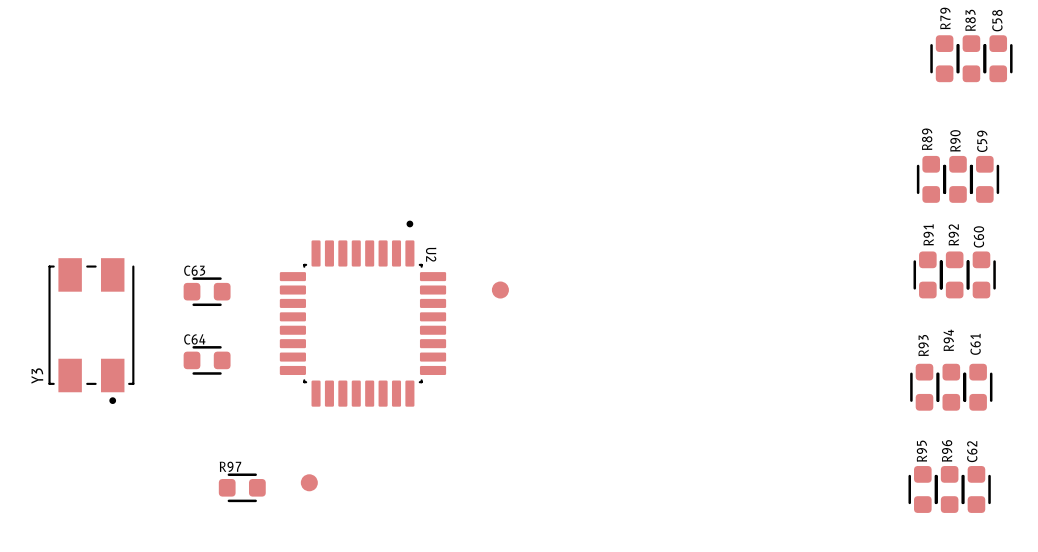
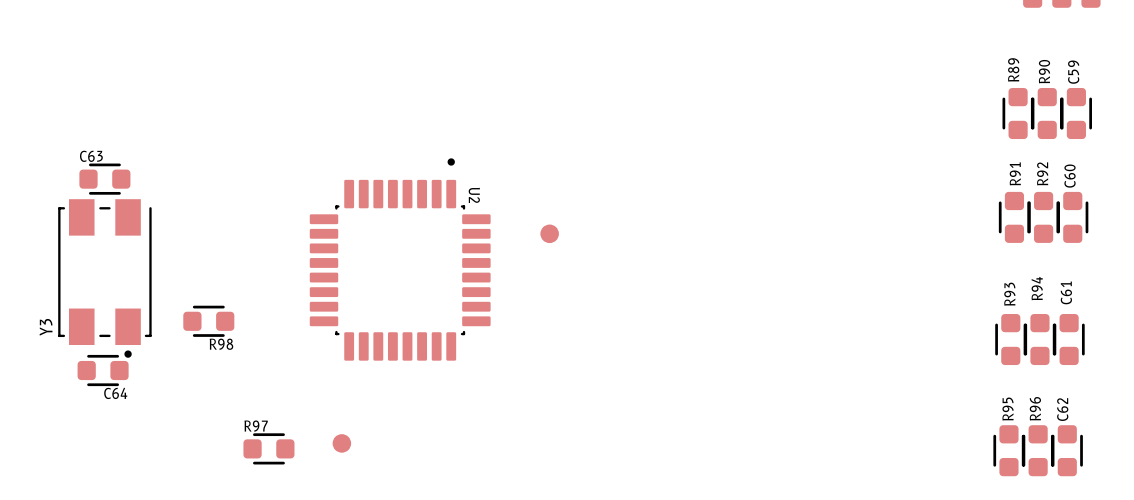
C63 position: (207, 291) -> (104, 179)
C64 name position: C64 (194, 339) -> C64 (115, 393)
C64 position: (207, 360) -> (103, 370)
R98: none -> (208, 321)

